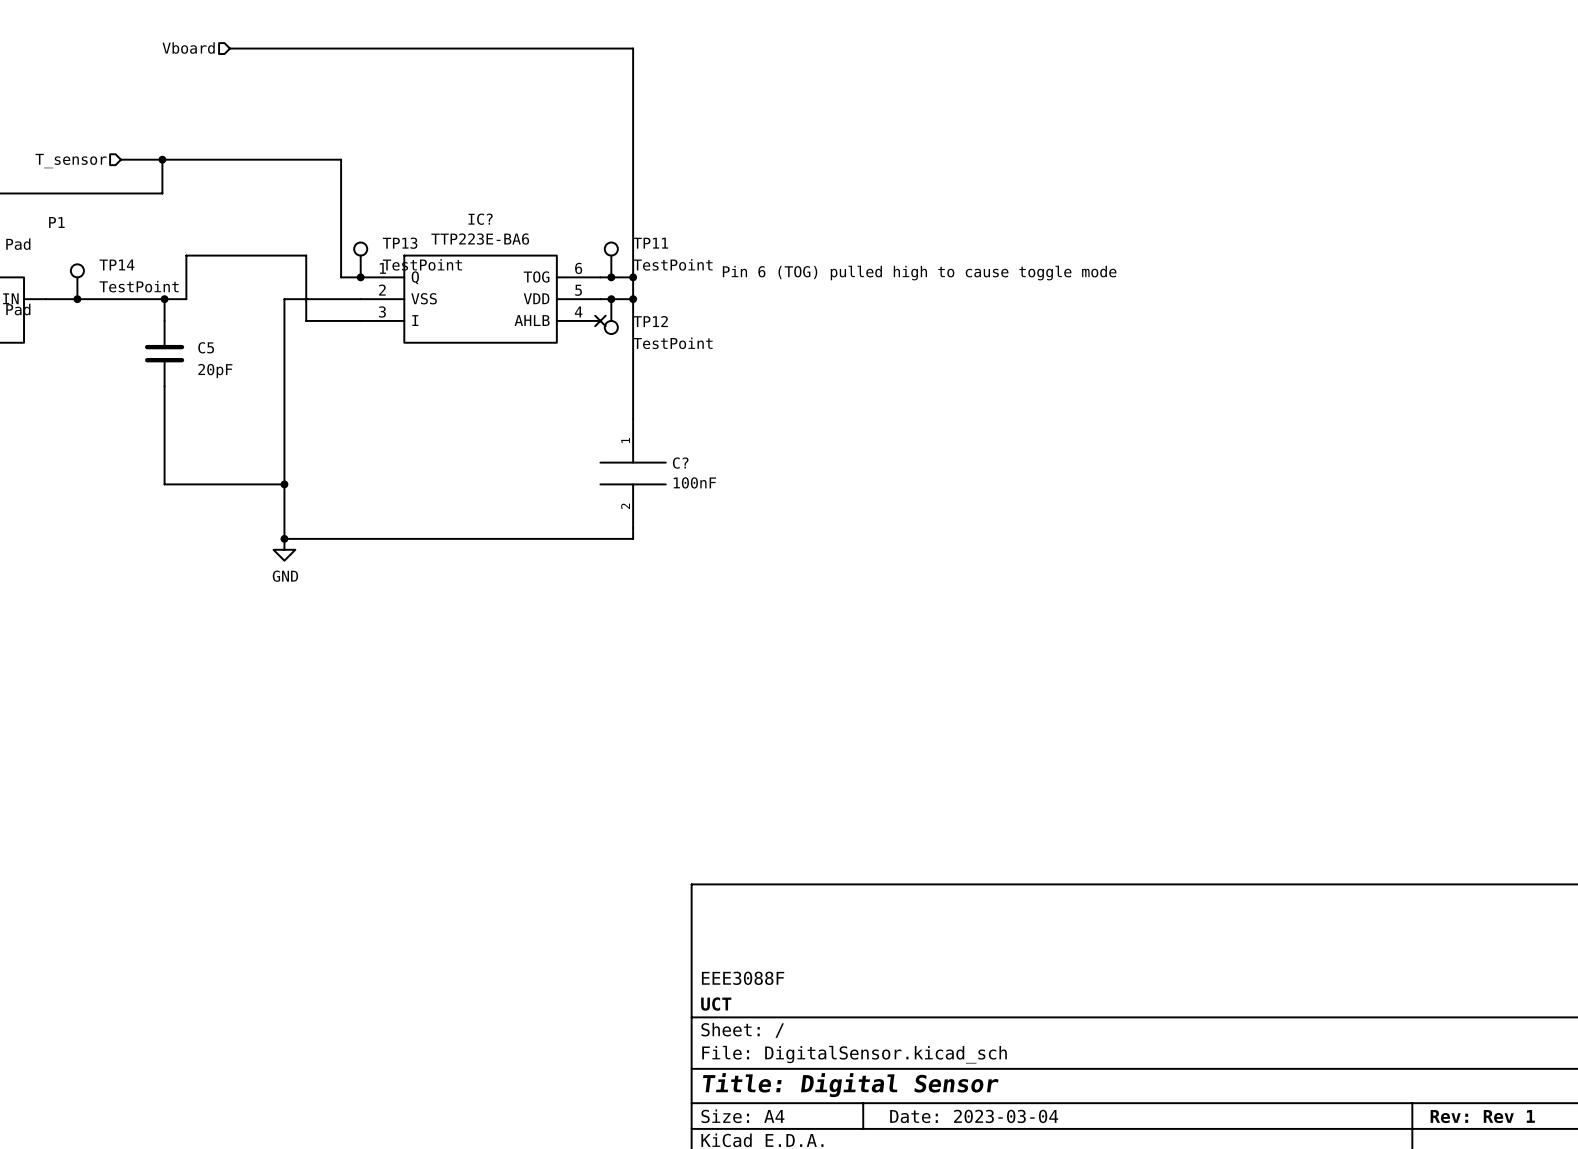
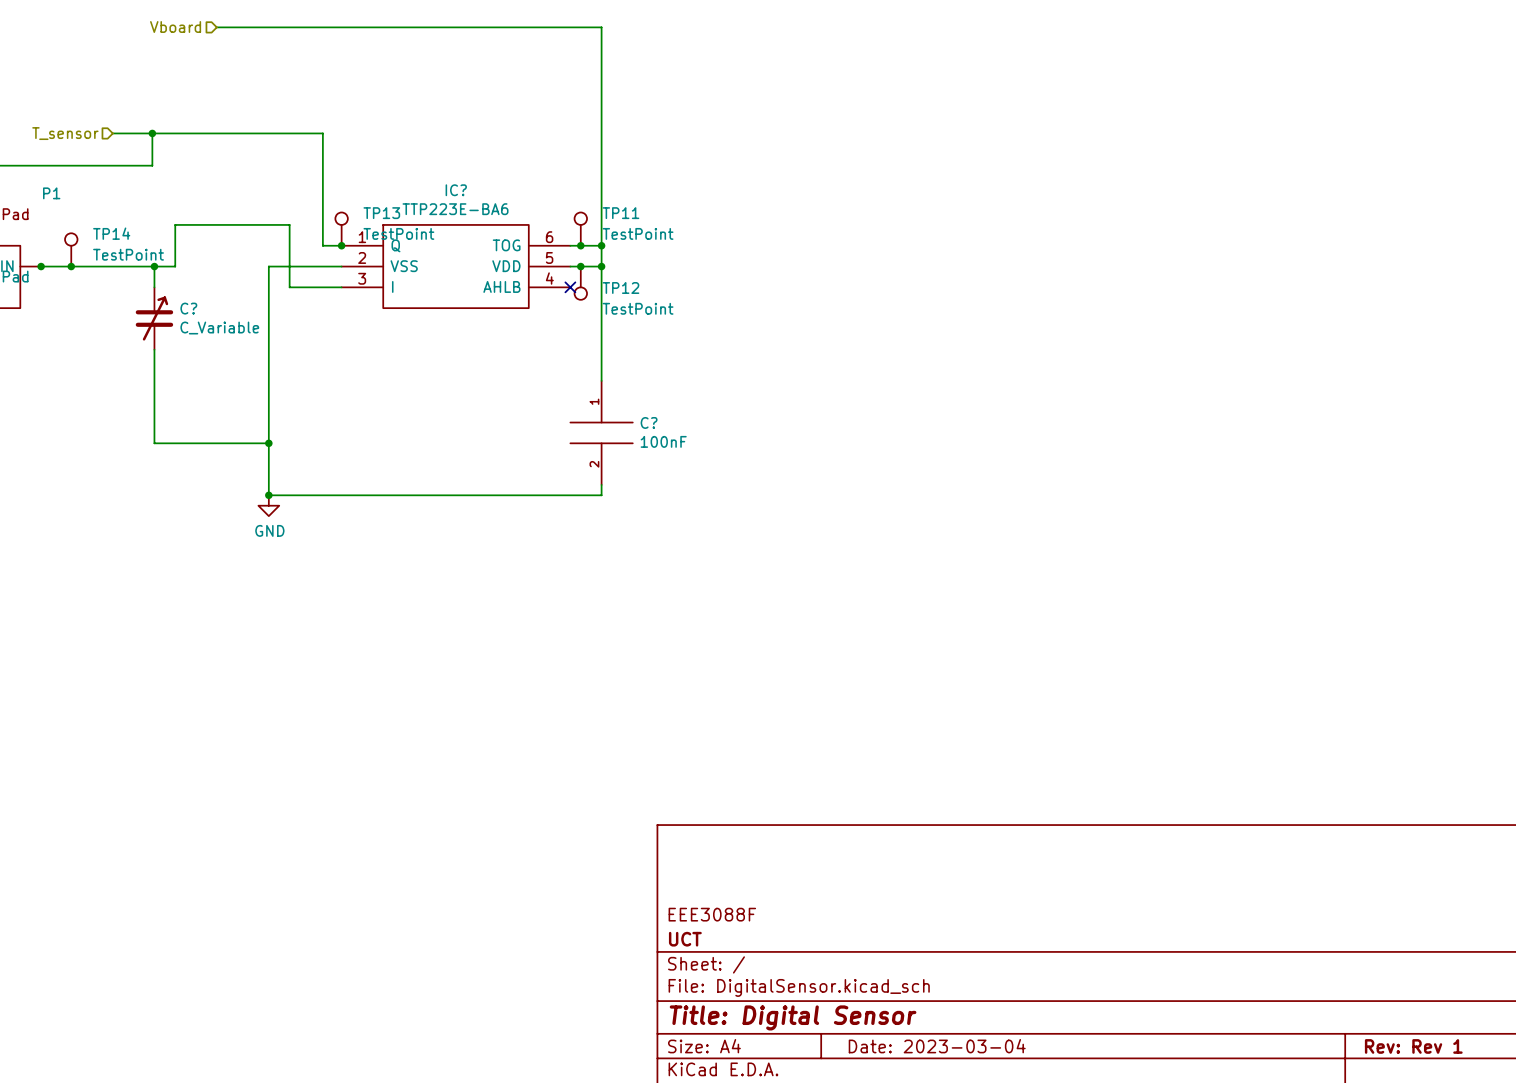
text: Pin 6 (TOG) pulled high to cause toggle mode (919, 273) -> none
junction: none -> (41, 266)
C5: 20pF (164, 353) -> none
C?: none -> C_Variable (154, 318)

